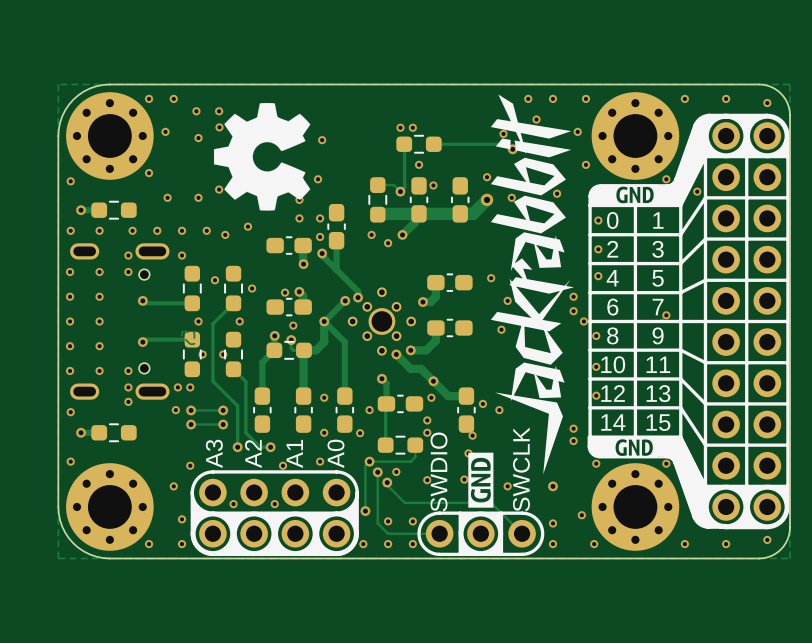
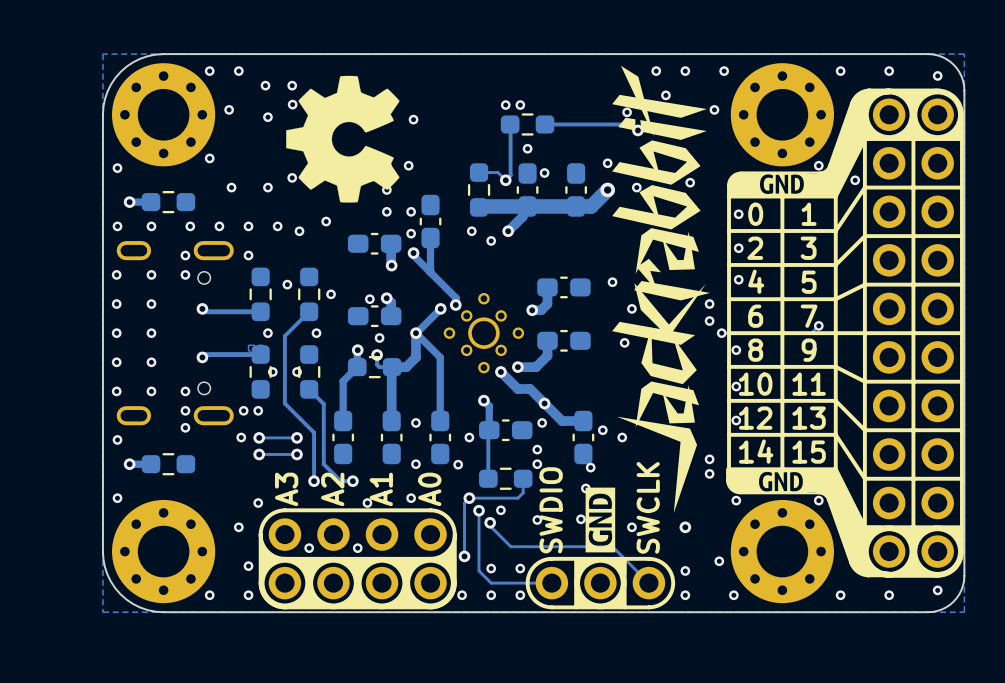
via: (585, 164) -> none

